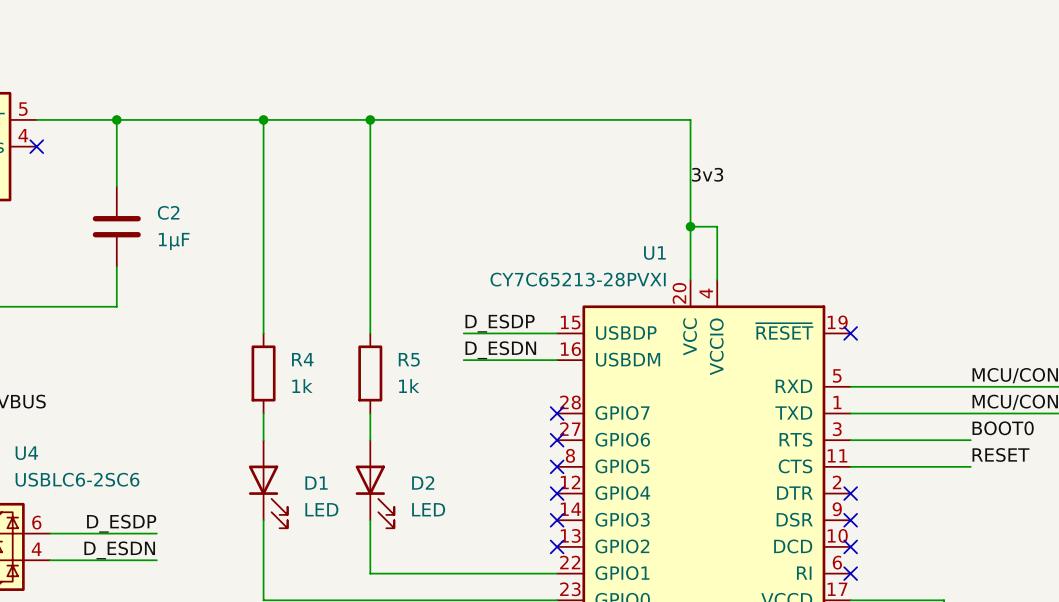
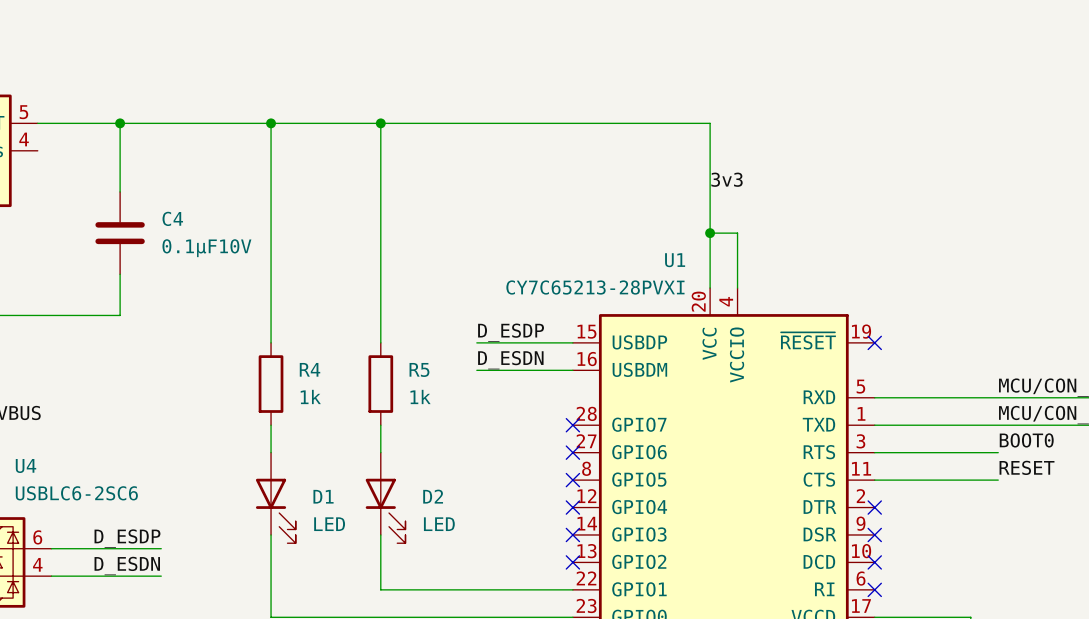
no-connect mark: (36, 146) -> none
C2 name: C2 (168, 212) -> C4 (172, 218)
C2 value: 1µF (174, 241) -> 0.1µF10V (206, 248)

